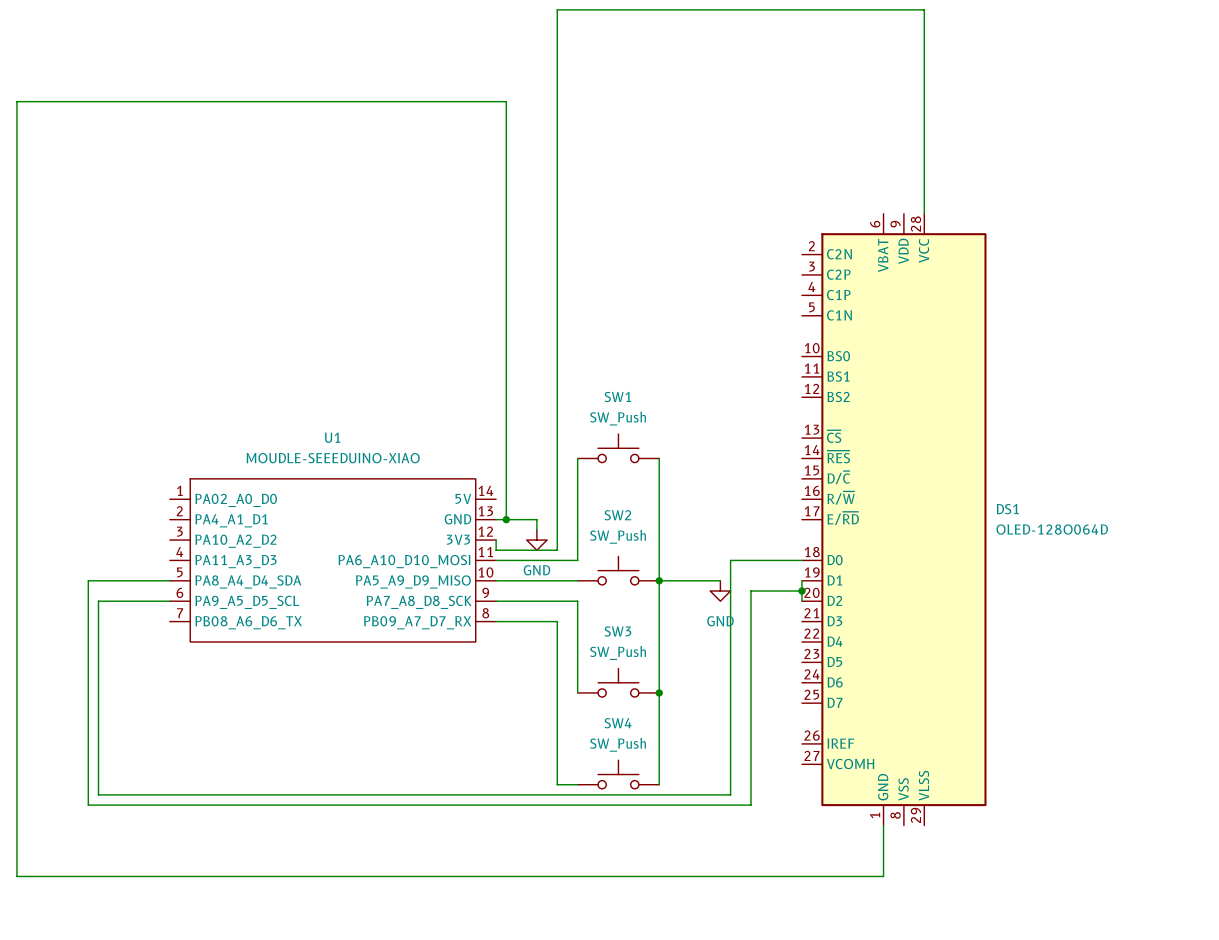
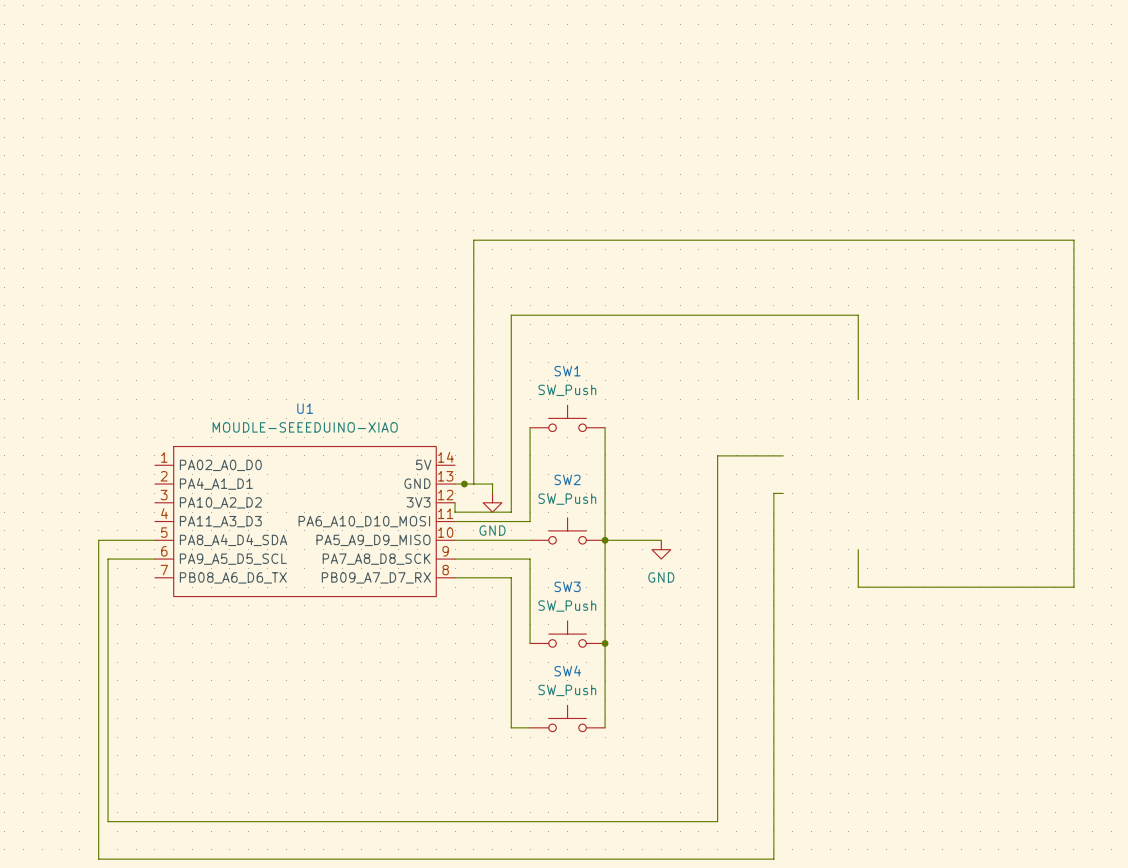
wire: (924, 213) (924, 9) (557, 9) (557, 336) -> (858, 399) (858, 315) (511, 315)
wire: (506, 519) (506, 101) (16, 101) (16, 876) (883, 876) (883, 825) -> none
wire: none -> (473, 484) (473, 240) (1073, 240) (1073, 587) (858, 587) (858, 549)
DS1: OLED-128O064D (894, 519) -> none
wire: (801, 560) (730, 560) (730, 794) (98, 794) (98, 601) (118, 601) -> (783, 455) (717, 455) (717, 821) (108, 821) (108, 559)
wire: (108, 580) (88, 580) (88, 805) (750, 805) (750, 591) (801, 591) -> (98, 540) (98, 859) (773, 859) (773, 493) (783, 493)
wire: (801, 580) (801, 601) -> none
junction: (801, 591) -> none

